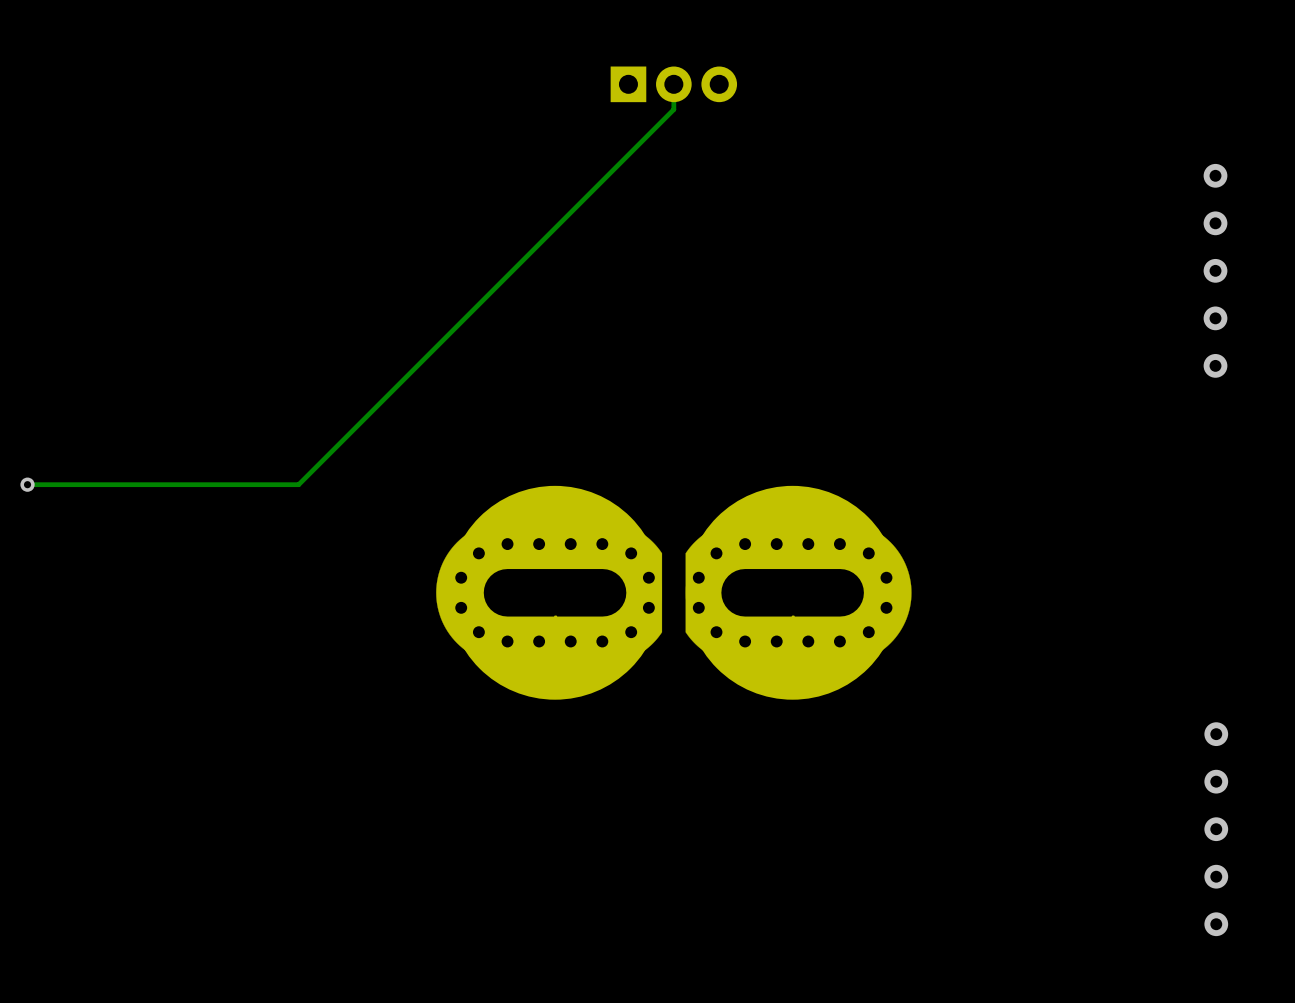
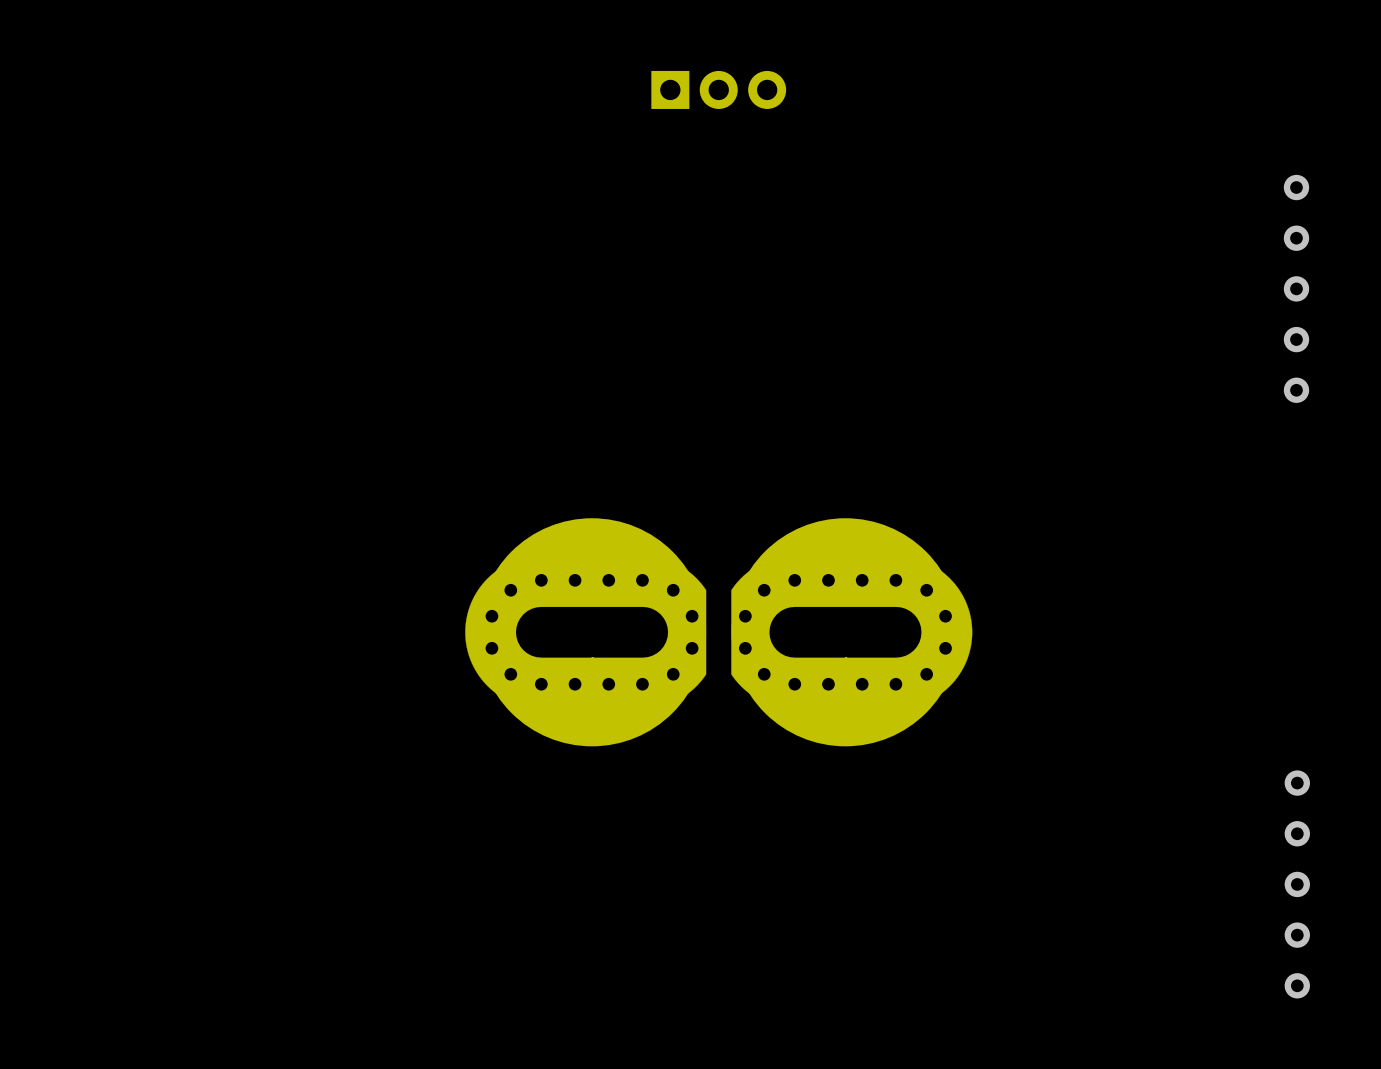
track: (673, 84) (673, 109) (298, 484) (27, 484) -> none
via: (27, 484) -> none

